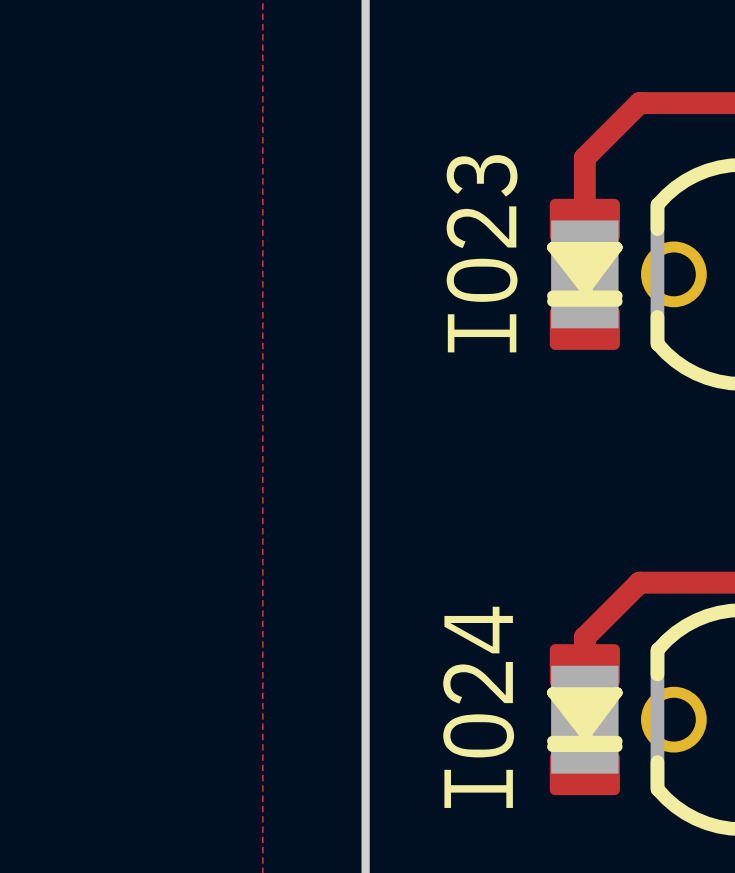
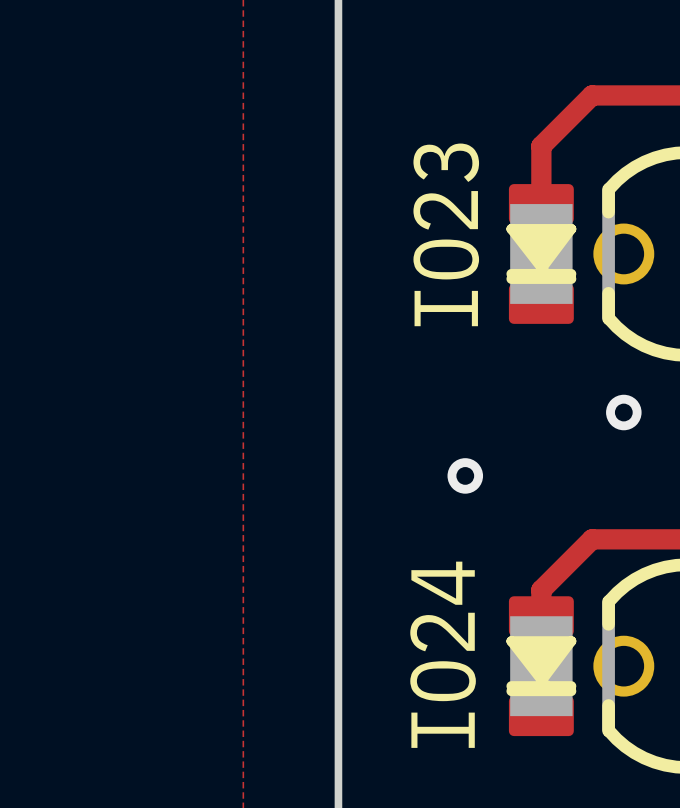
via: none -> (623, 412)
via: none -> (465, 475)

